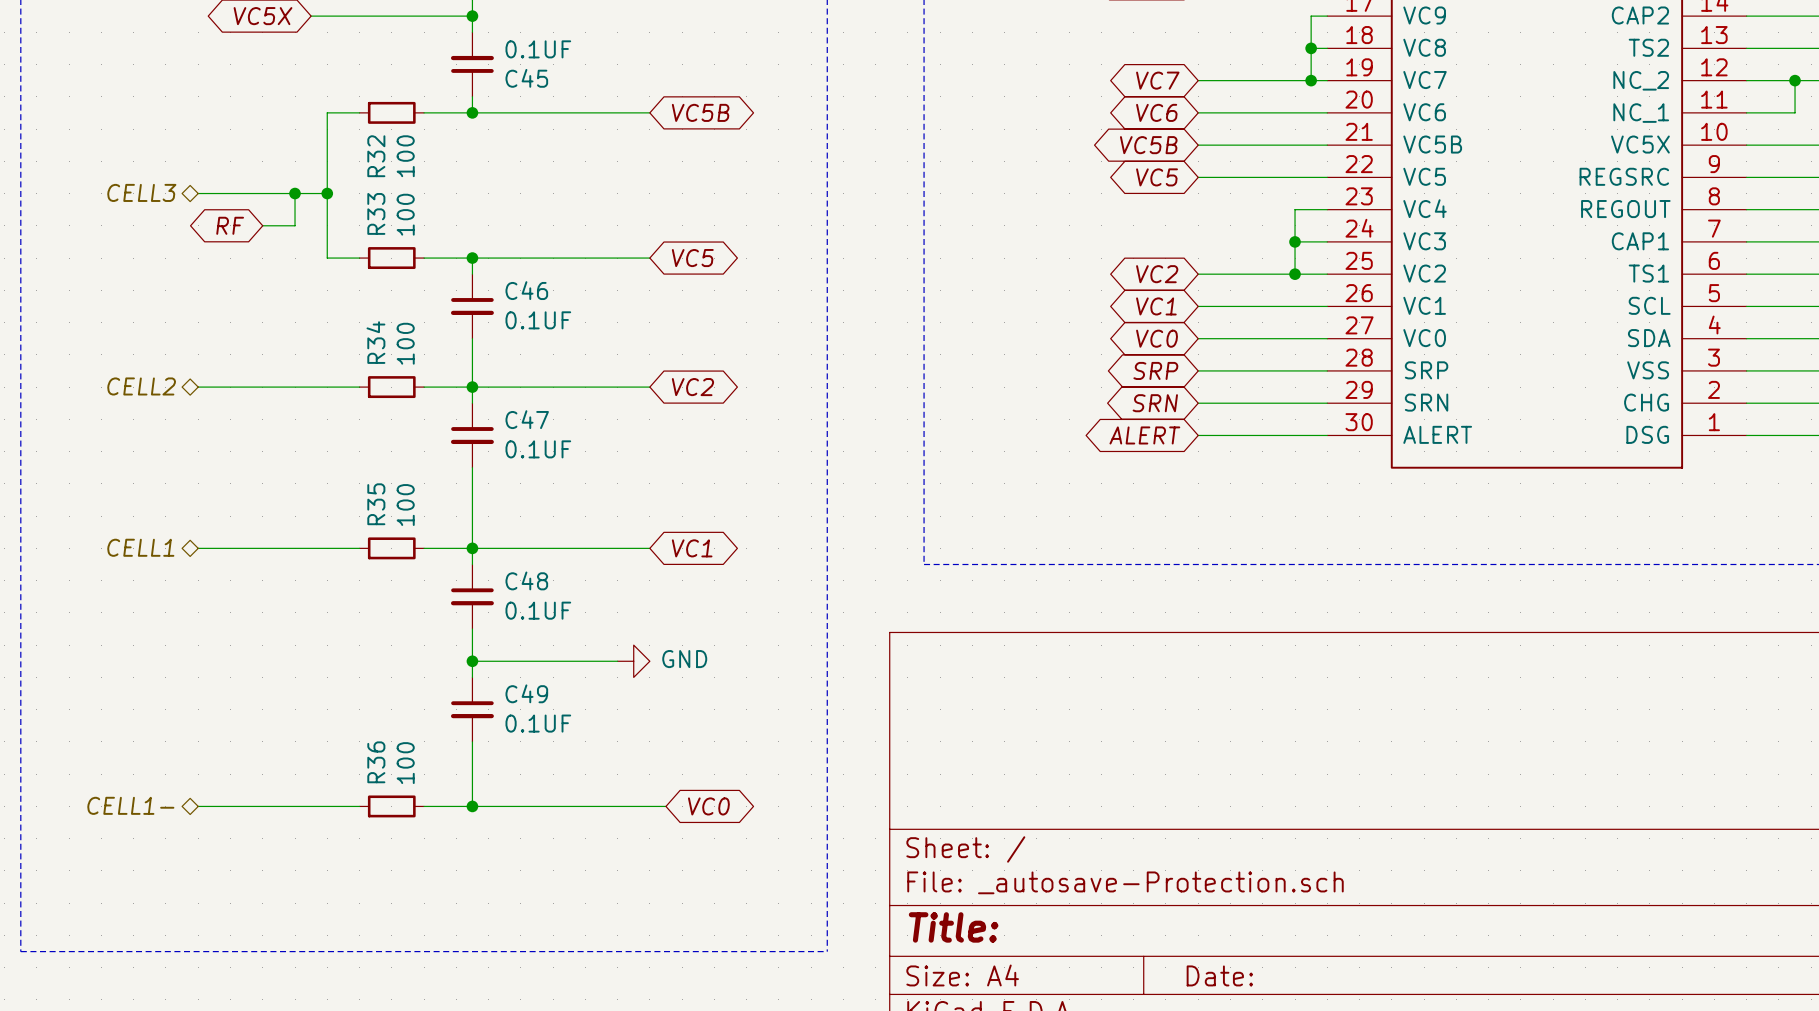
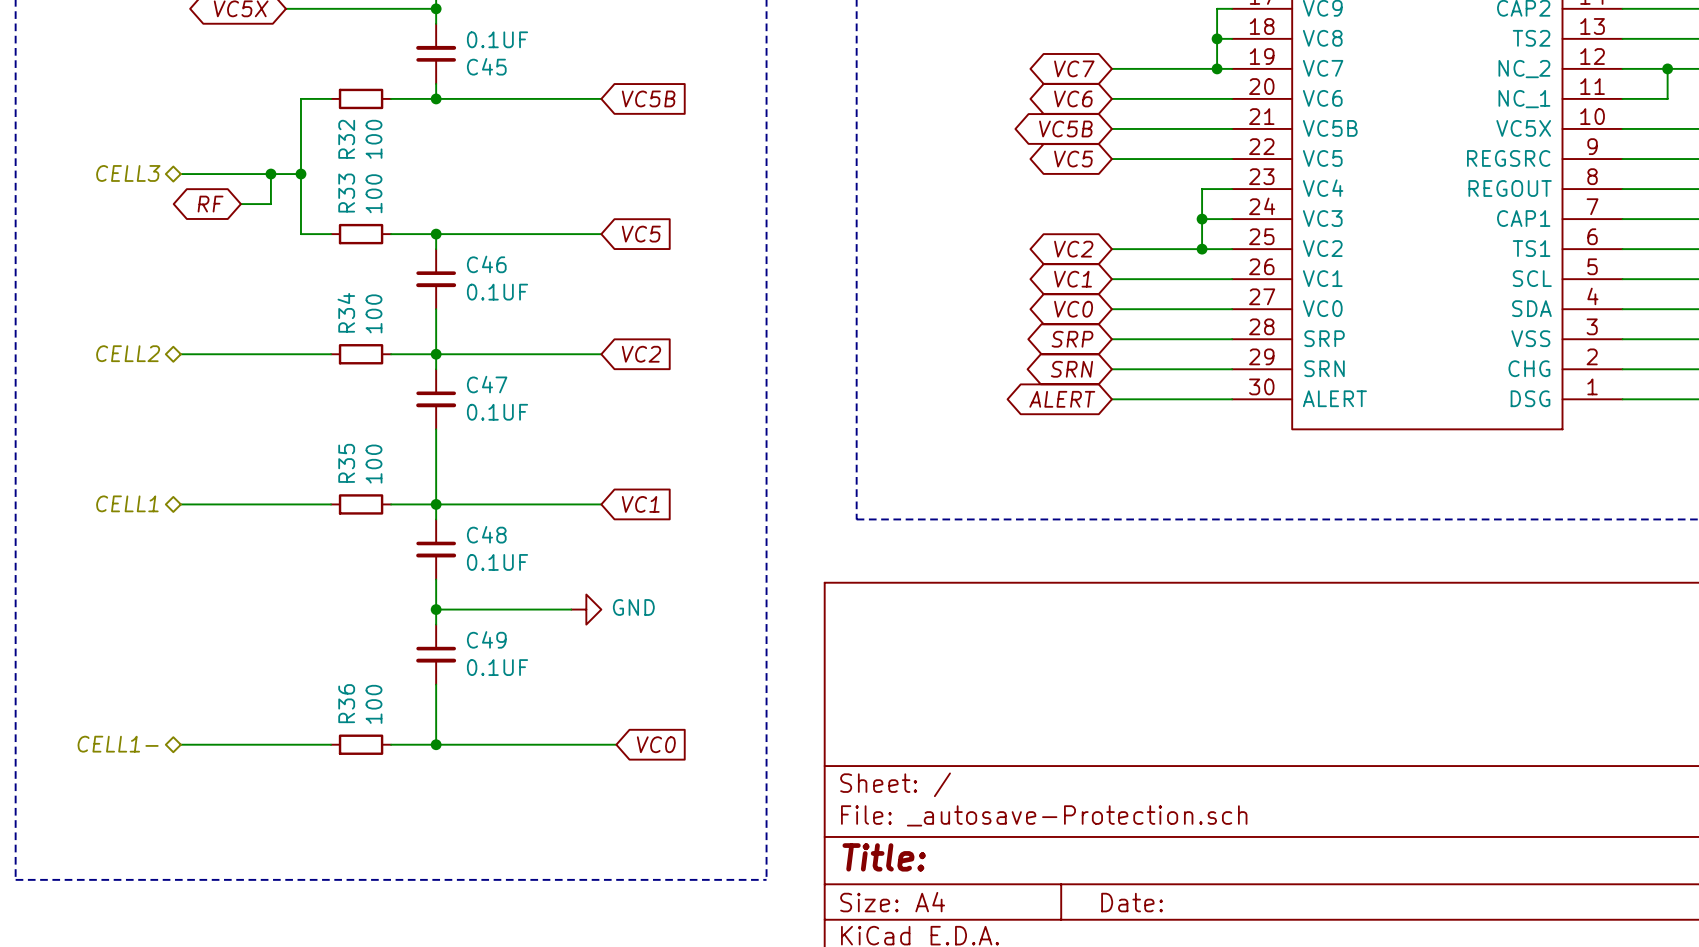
global label shape: bidirectional (700, 112) -> input (648, 98)
global label shape: bidirectional (692, 258) -> input (641, 234)
global label shape: bidirectional (692, 387) -> input (641, 354)
global label shape: bidirectional (692, 548) -> input (640, 504)
global label shape: bidirectional (708, 806) -> input (656, 744)

